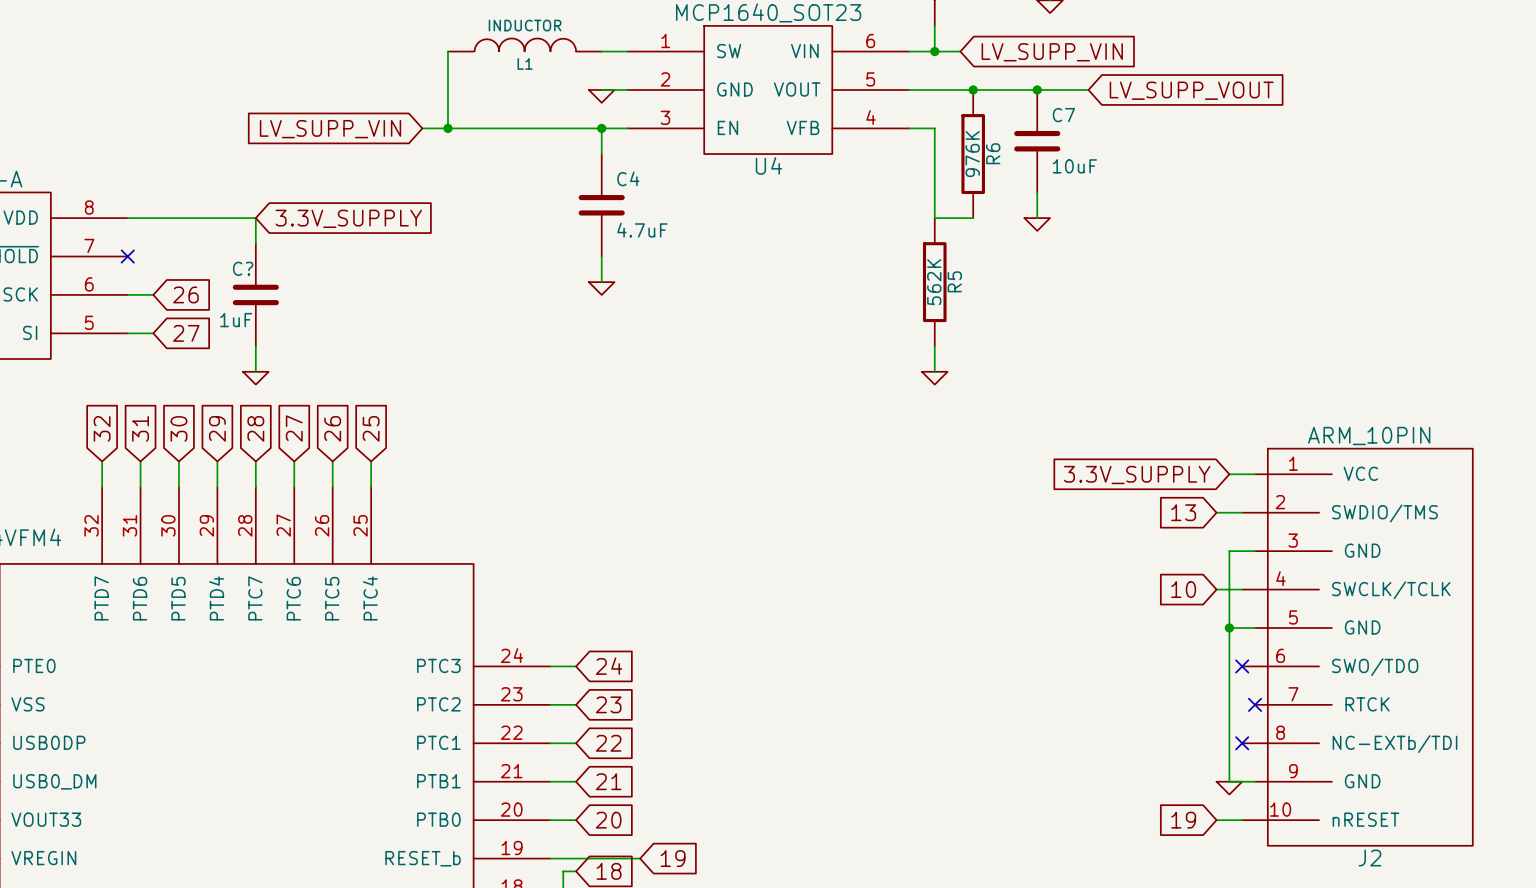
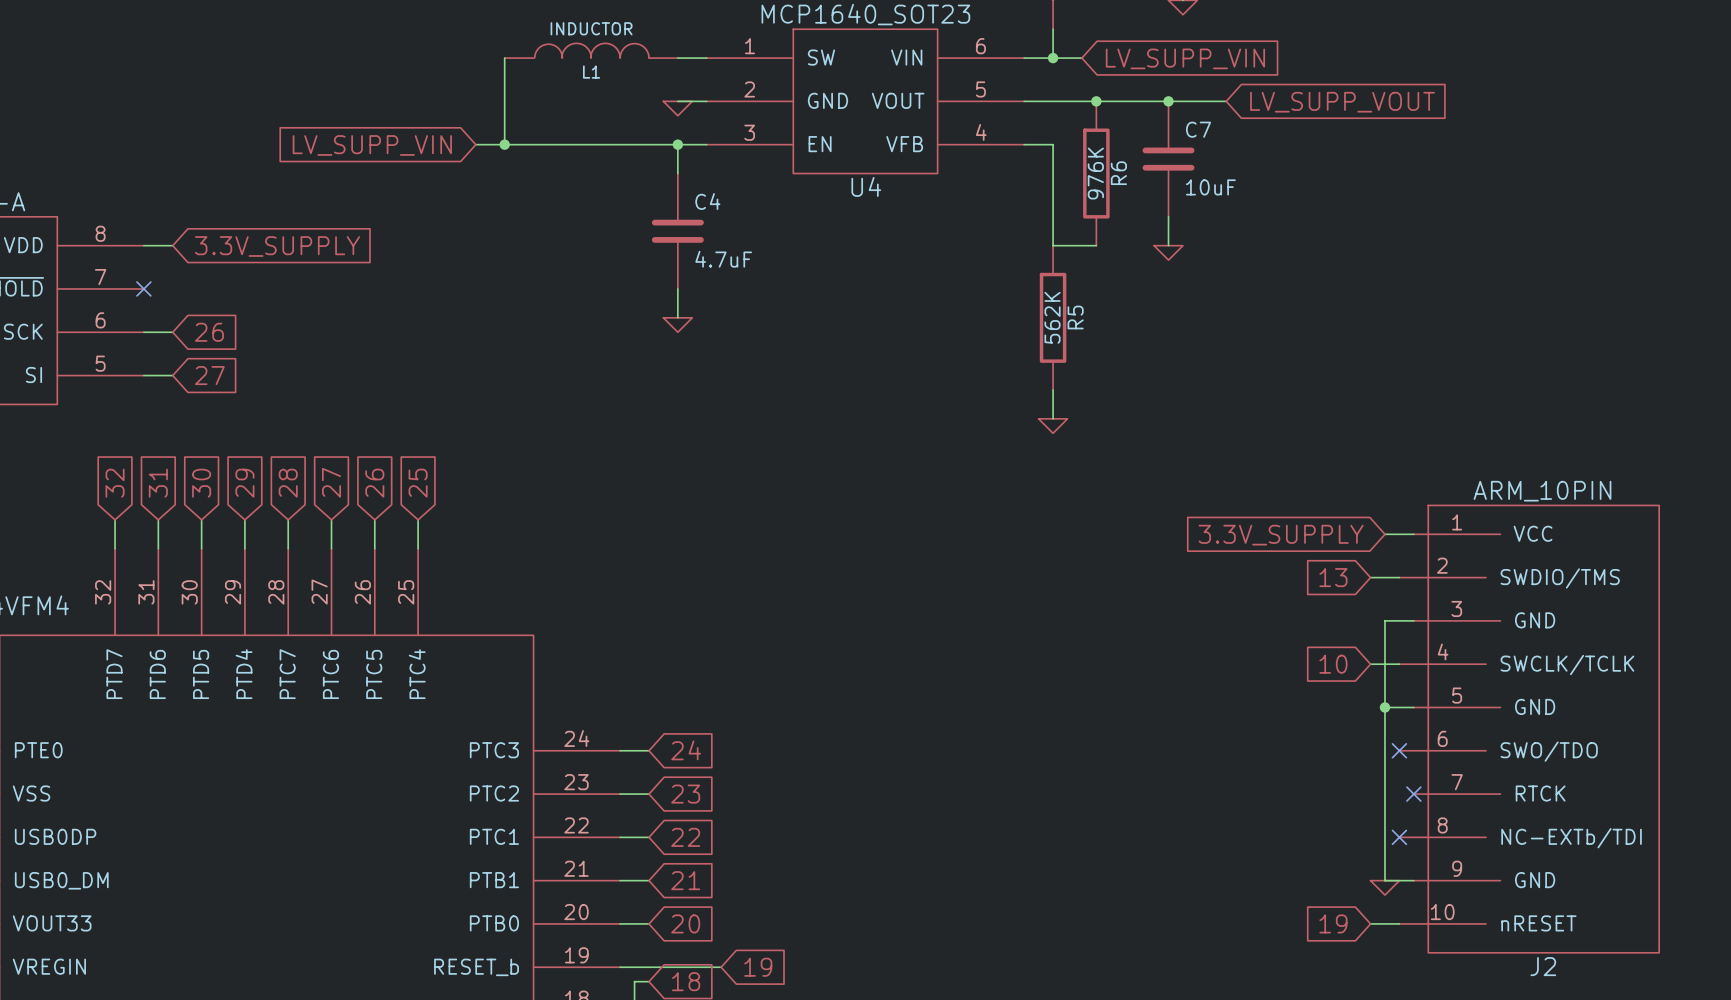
wire: (153, 218) (255, 218) (255, 243) -> none
global label position: 3.3V_SUPPLY (348, 218) -> 3.3V_SUPPLY (277, 246)
C?: 1uF (255, 294) -> none
wire: (255, 346) (255, 371) -> none
power symbol: (255, 378) -> none

